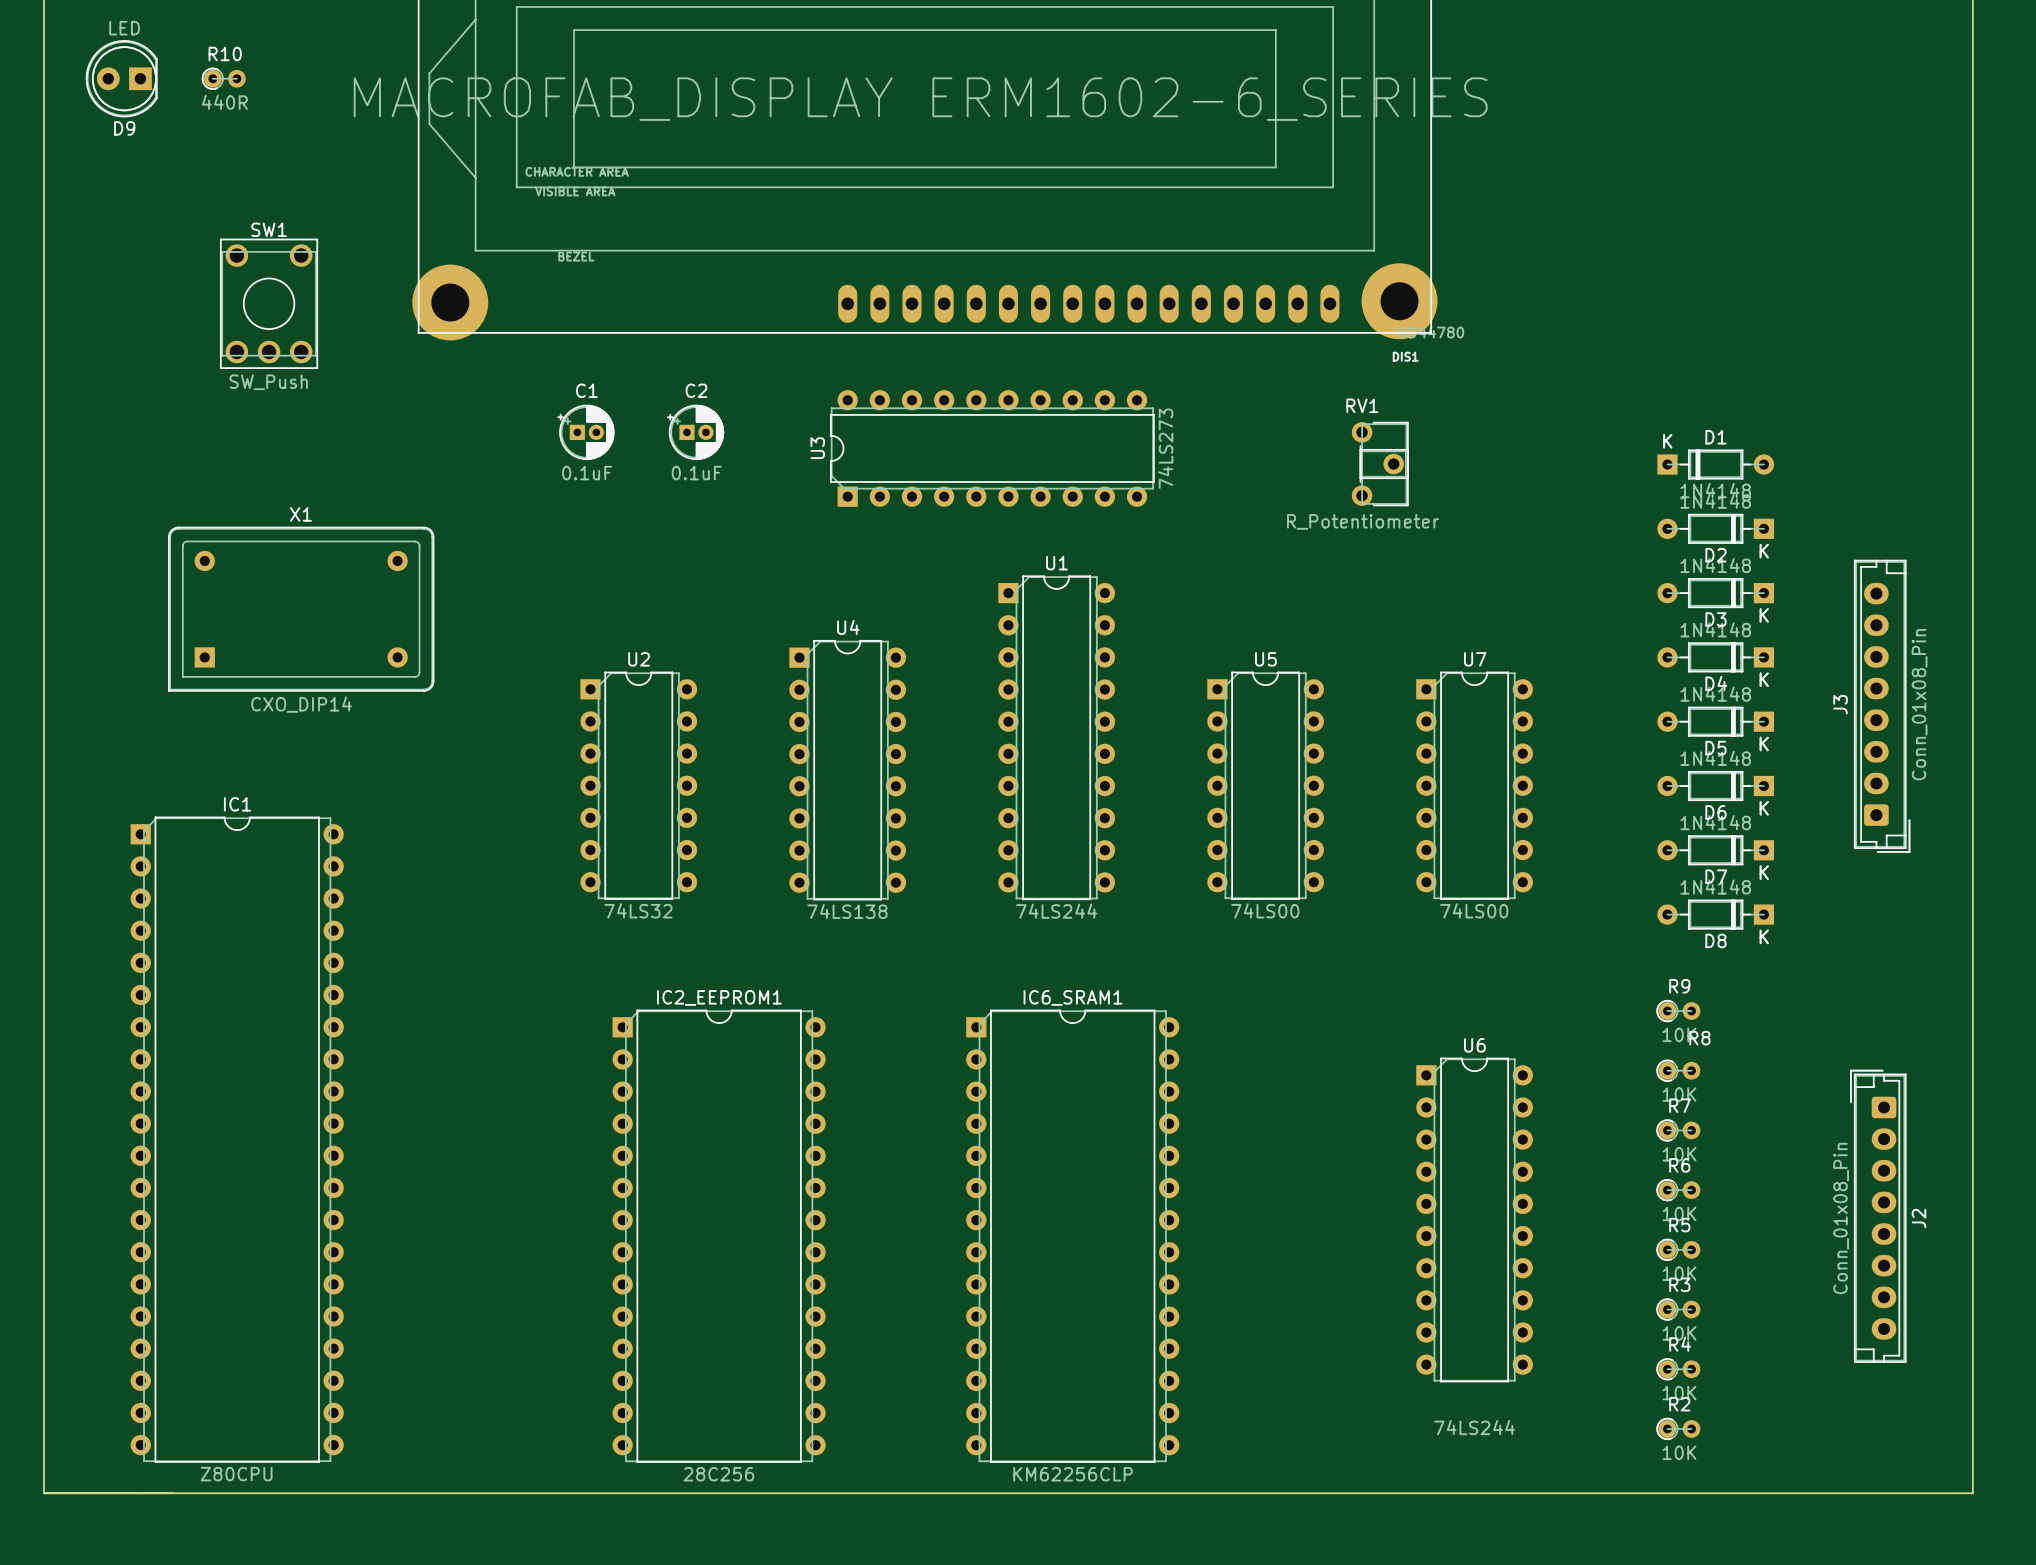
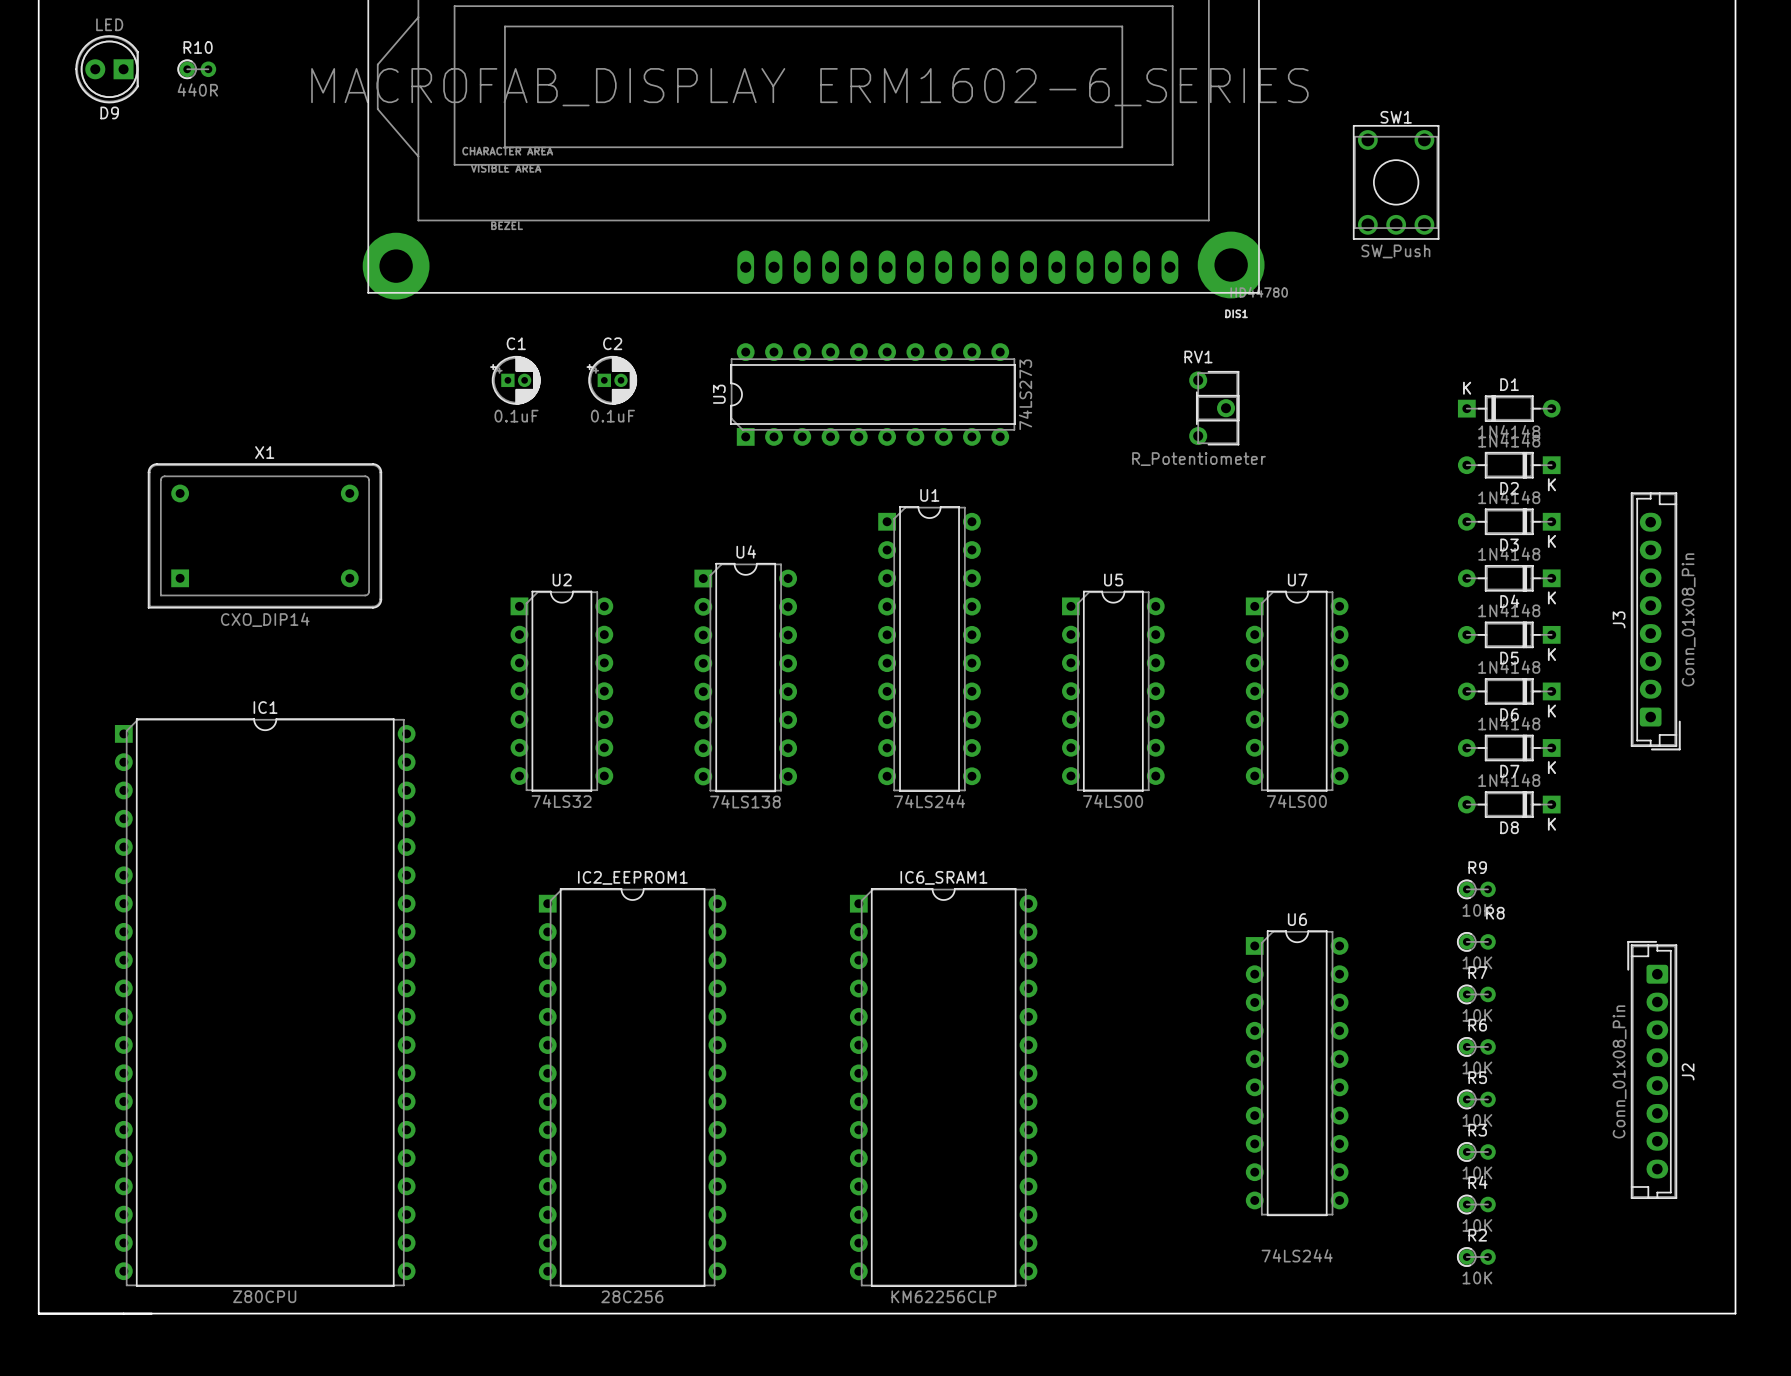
SW1 position: (269, 303) -> (1396, 182)
IC1 footprint: [130, 816, 344, 1463] -> [114, 718, 416, 1287]

